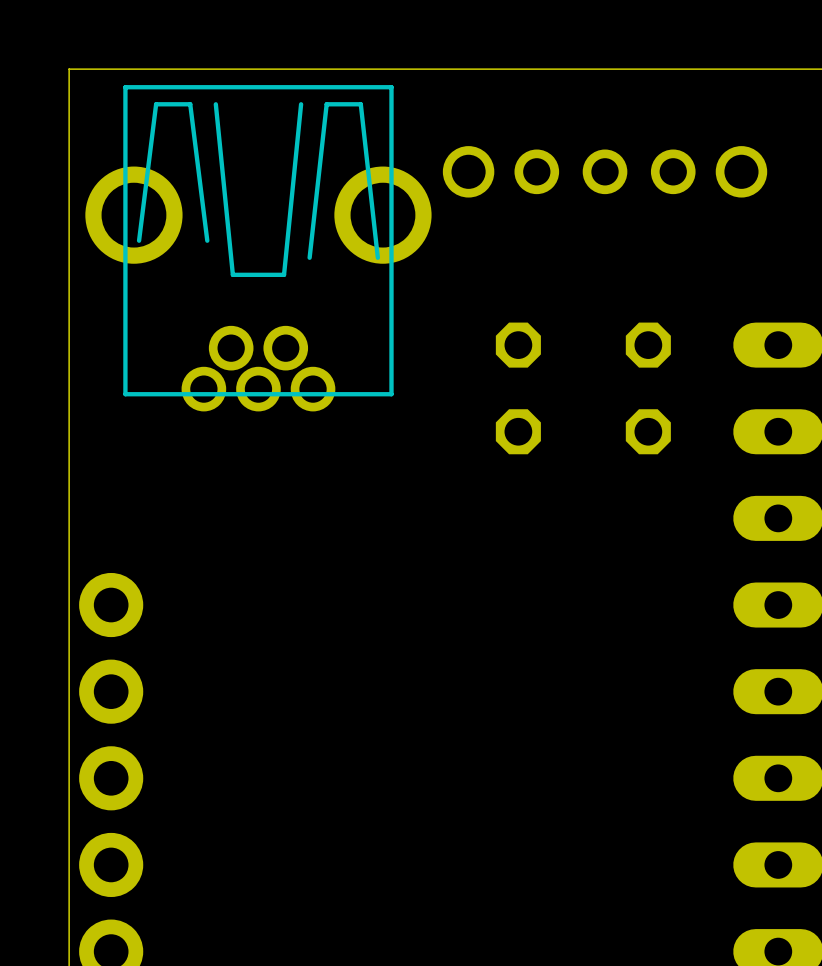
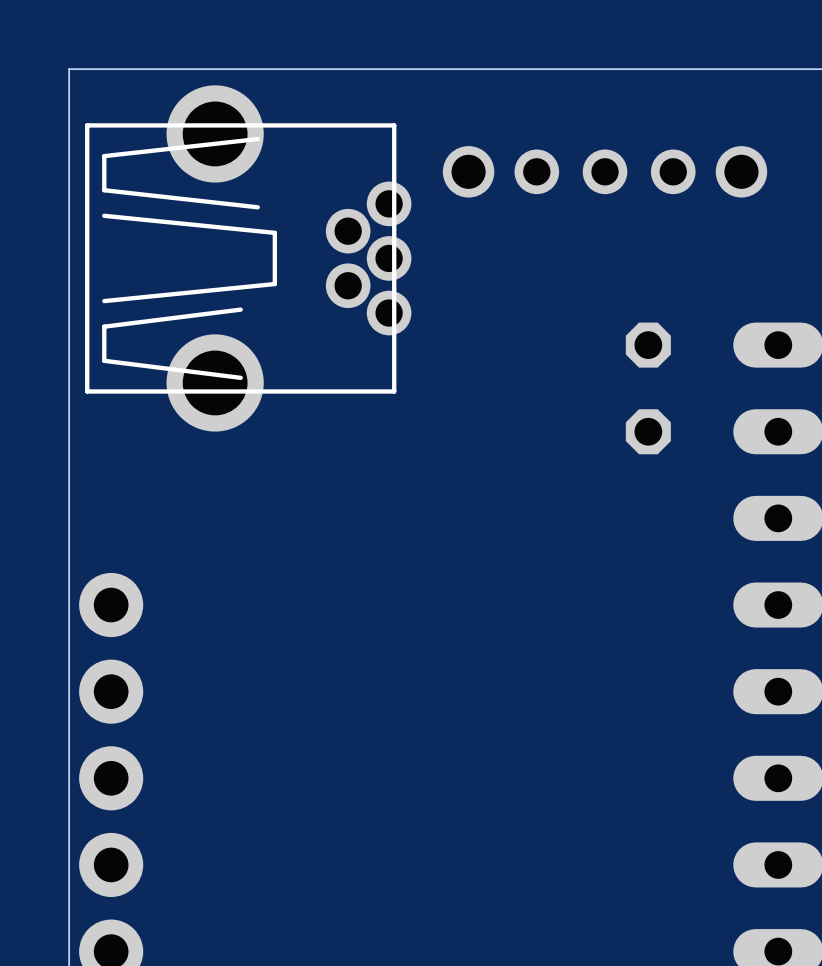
part rotation: 0° (258, 248) -> 90° counterclockwise (248, 258)
part: (518, 388) -> none

